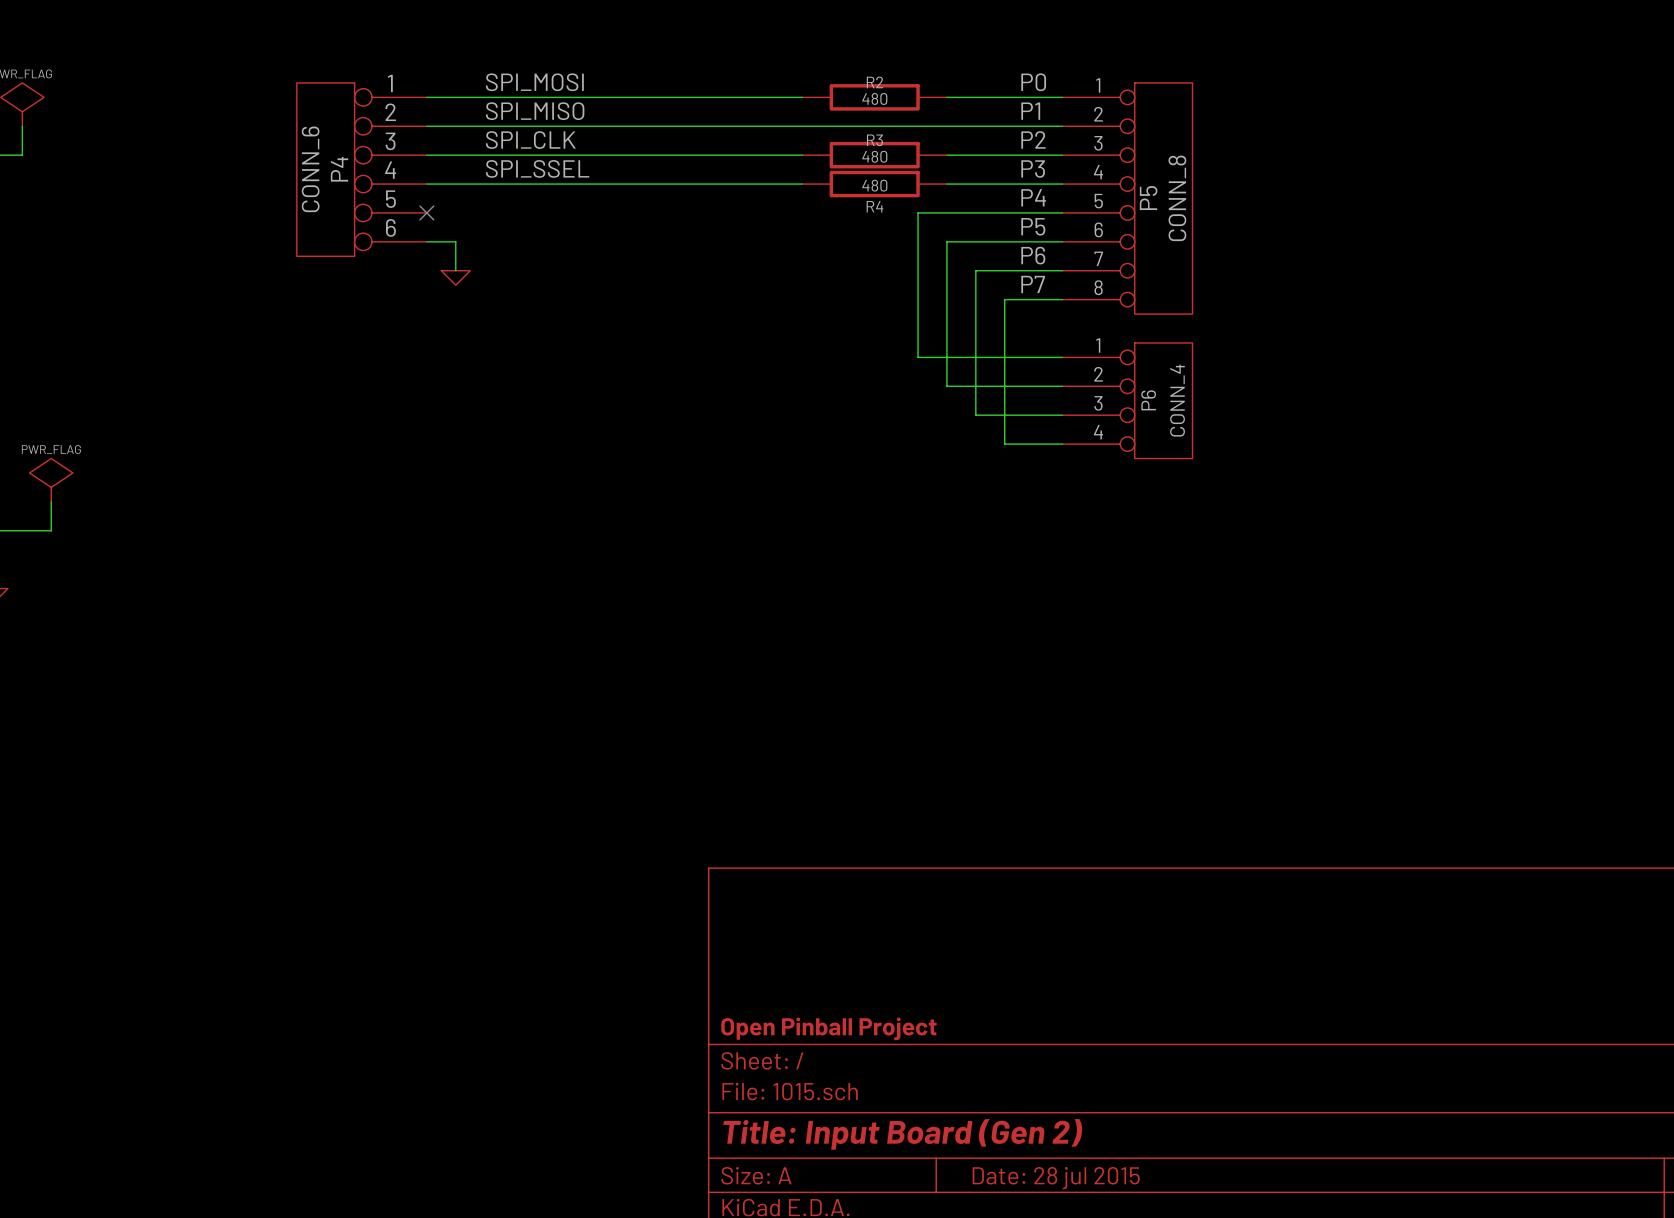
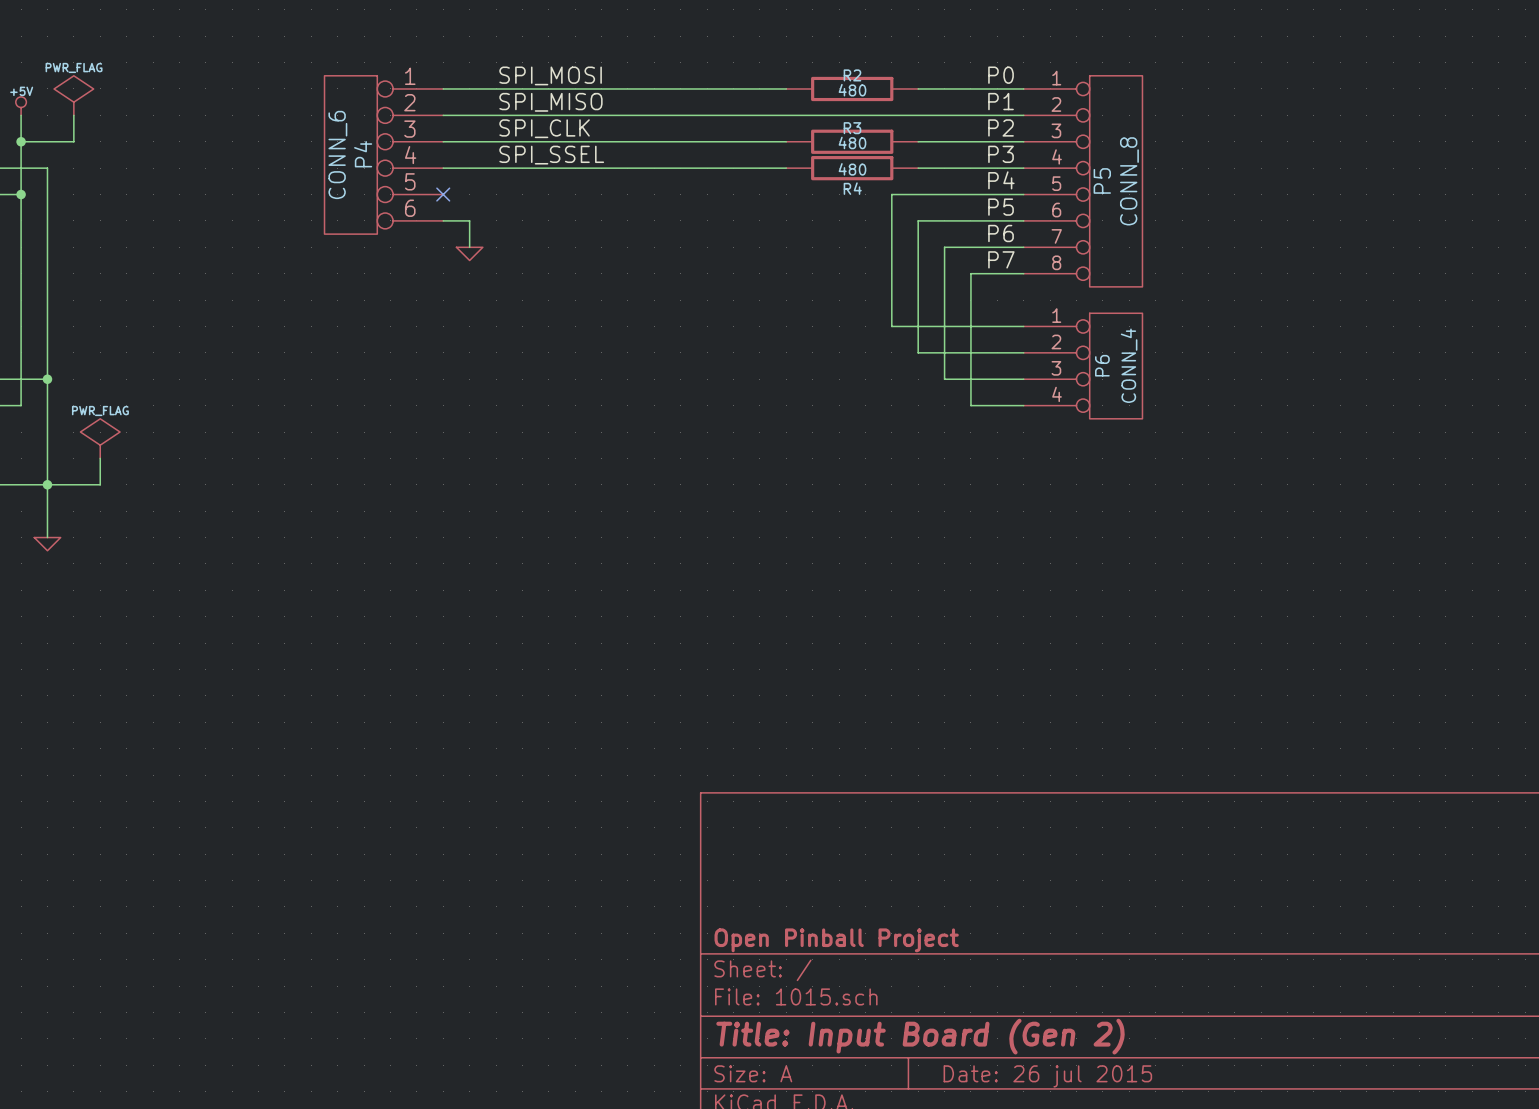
title block: Date: 28 jul 2015 (1056, 1178) -> Date: 26 jul 2015 (1047, 1076)

